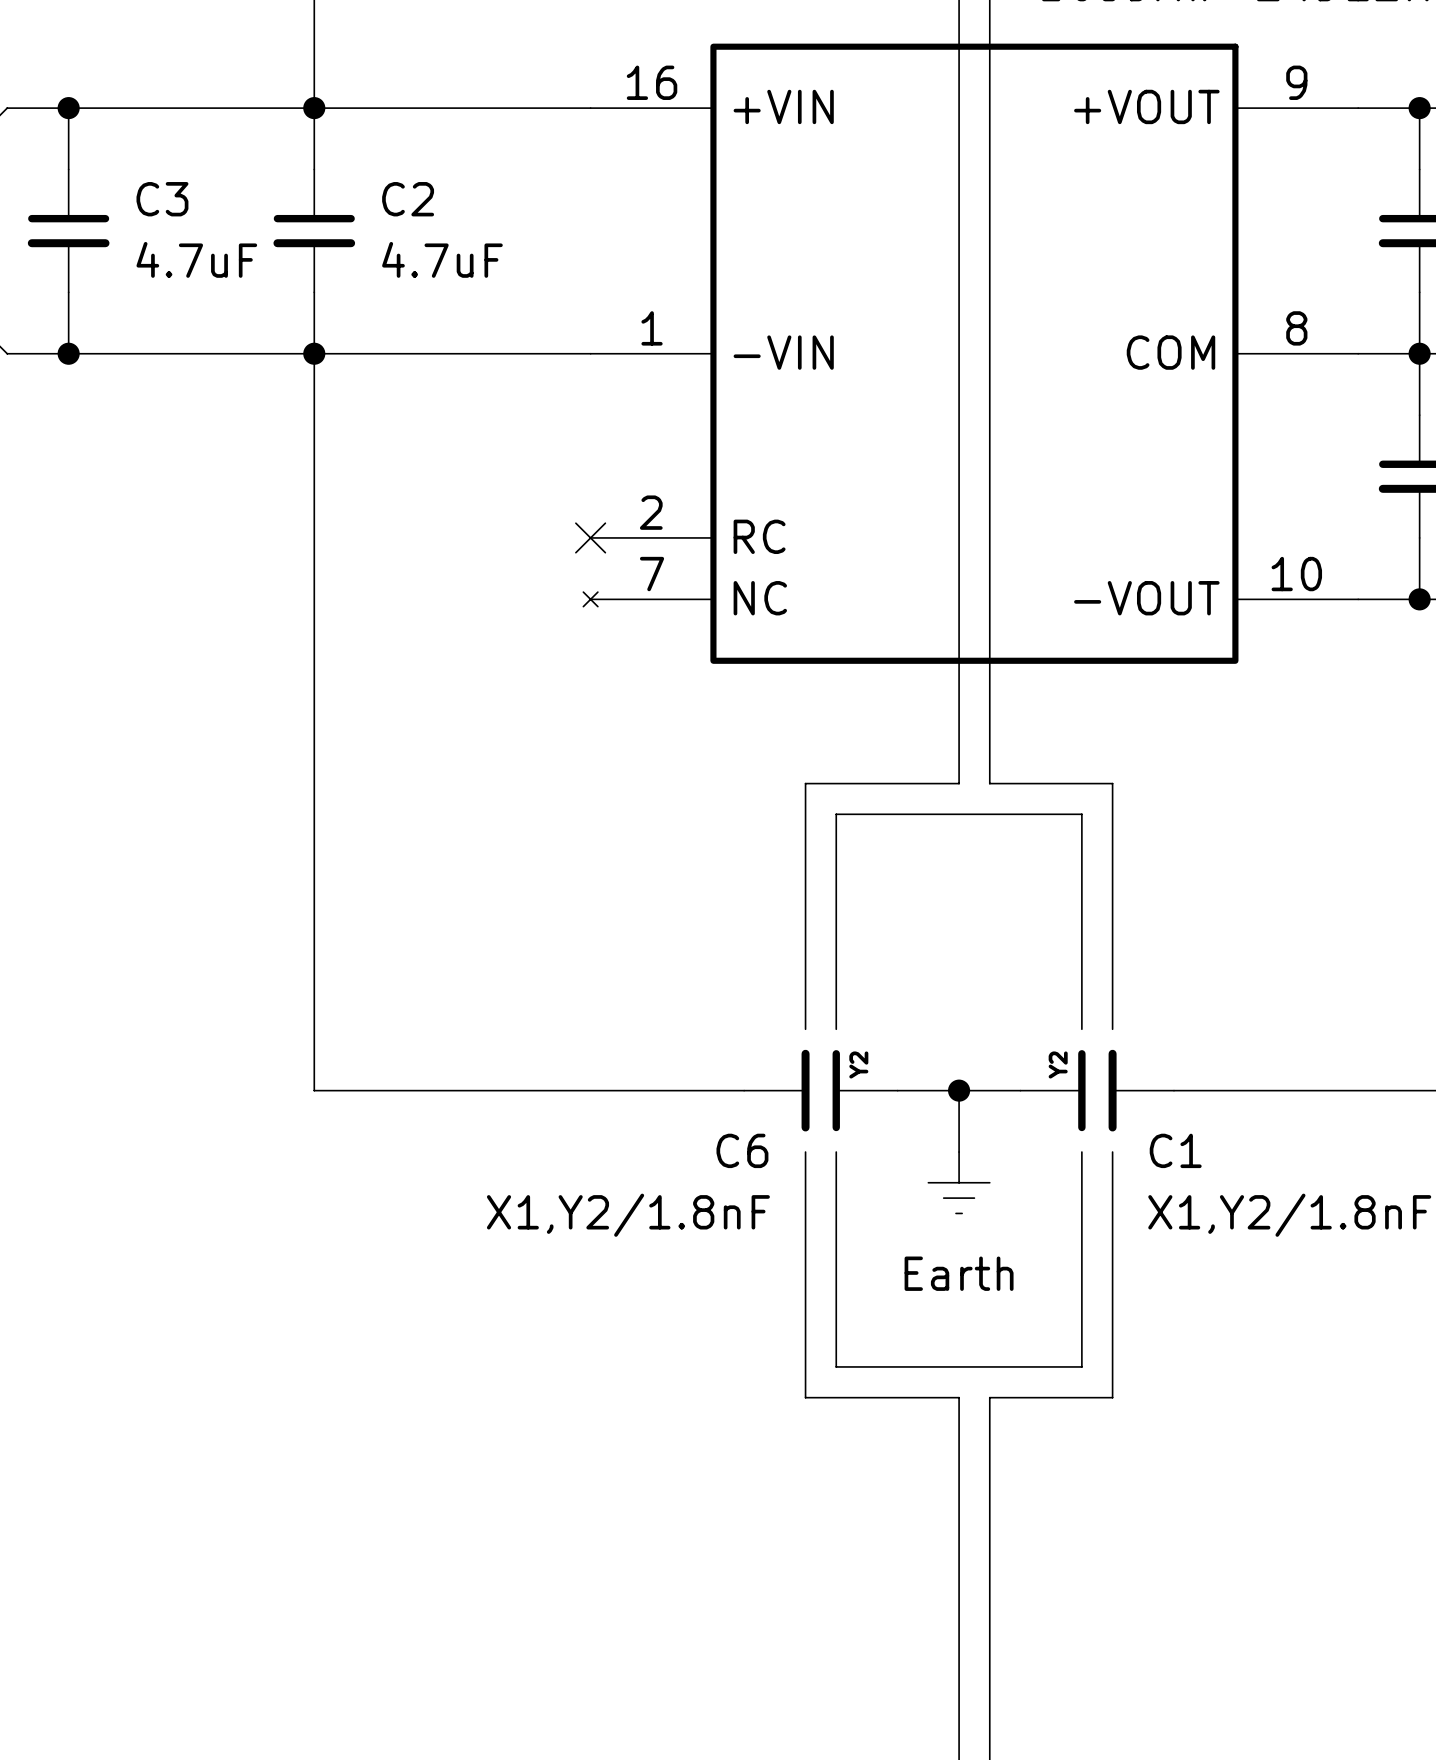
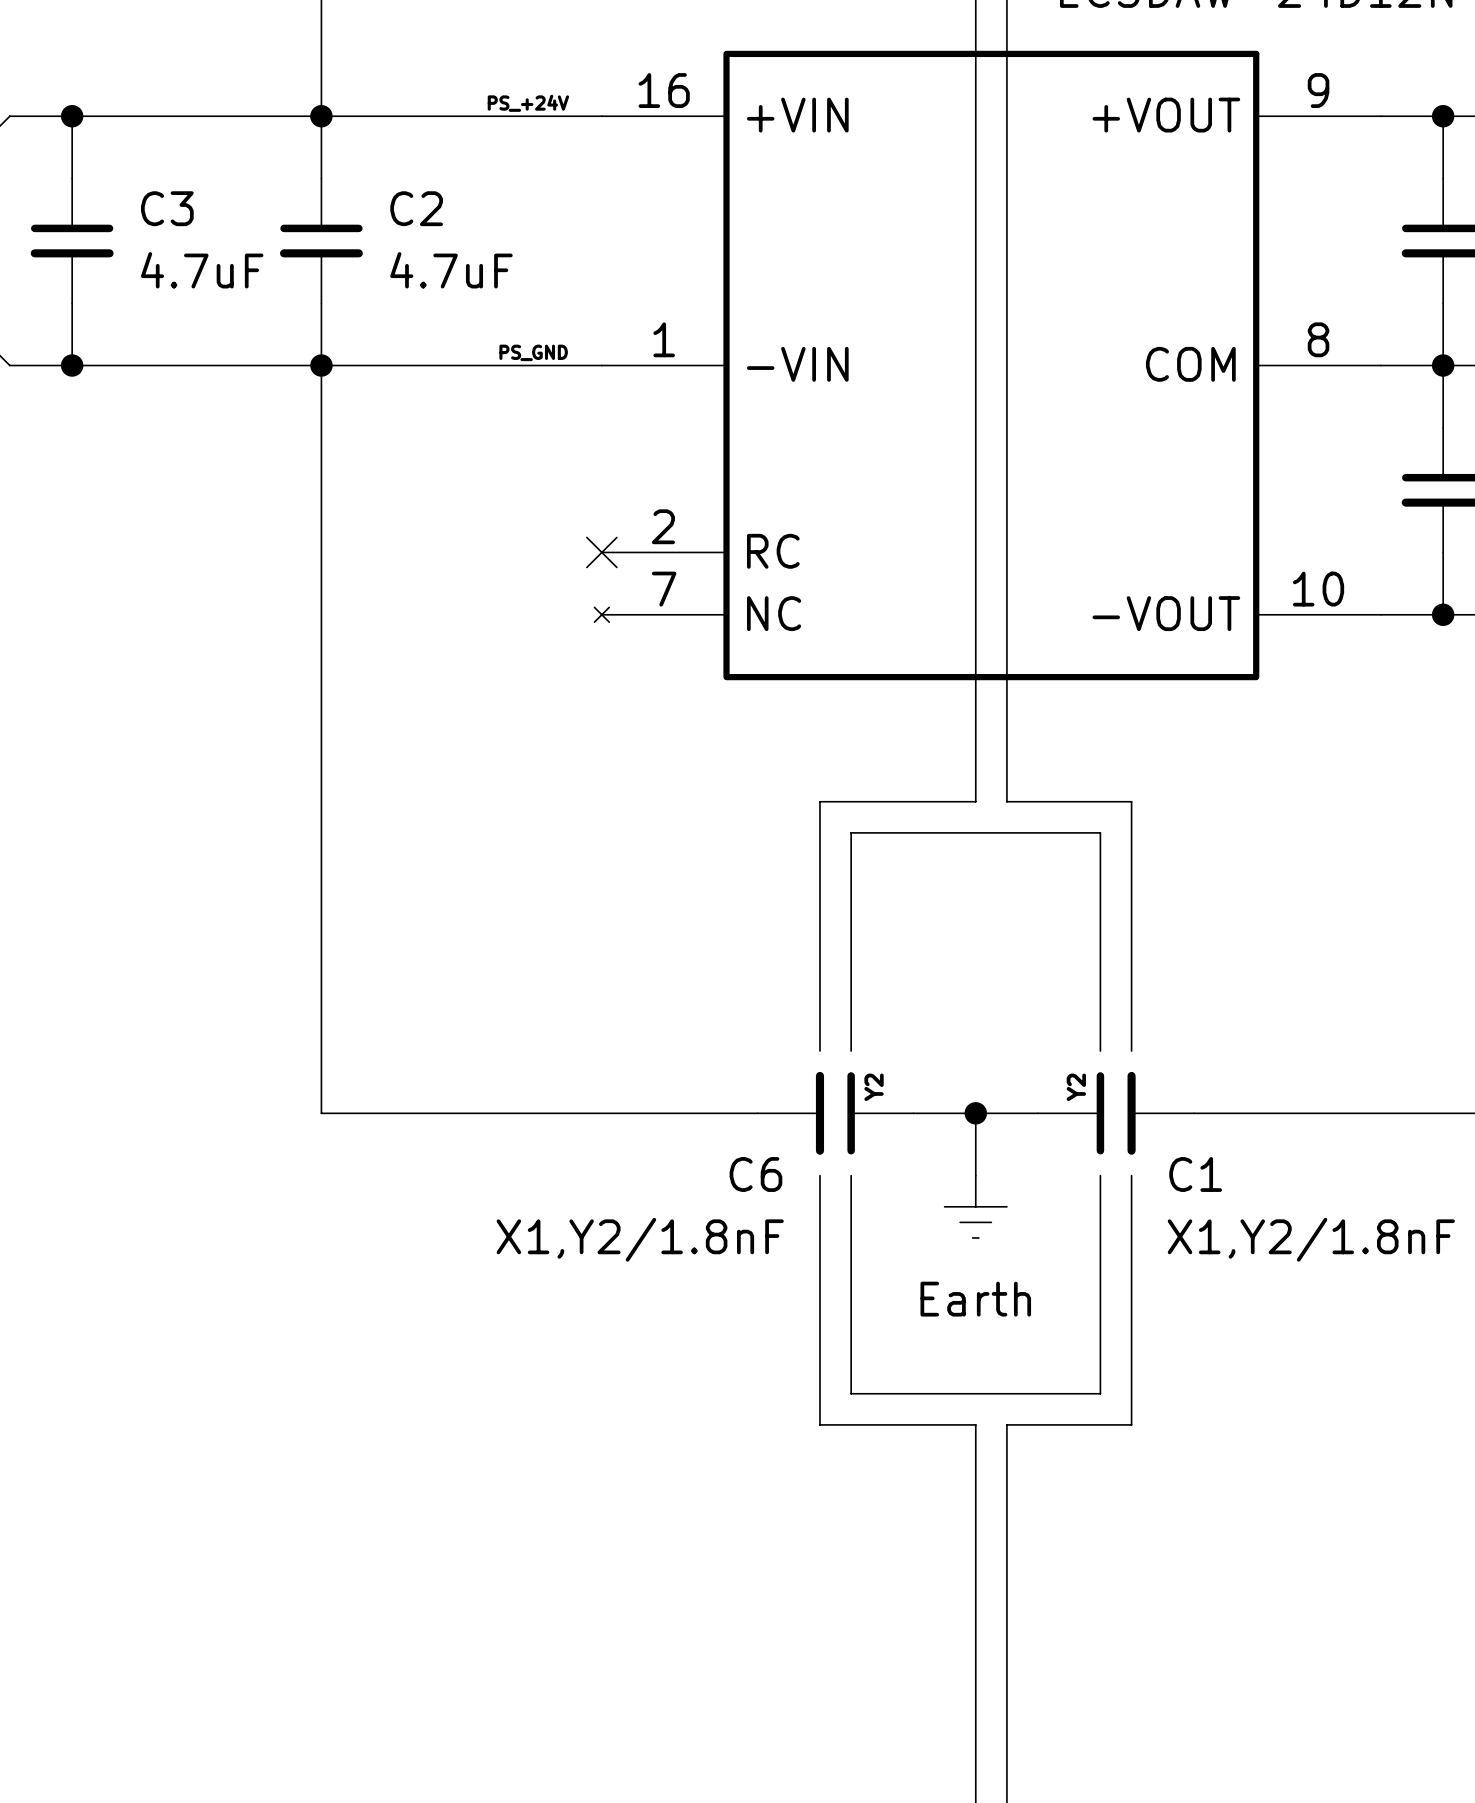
label: none -> PS_+24V (528, 103)
label: none -> PS_GND (533, 352)

